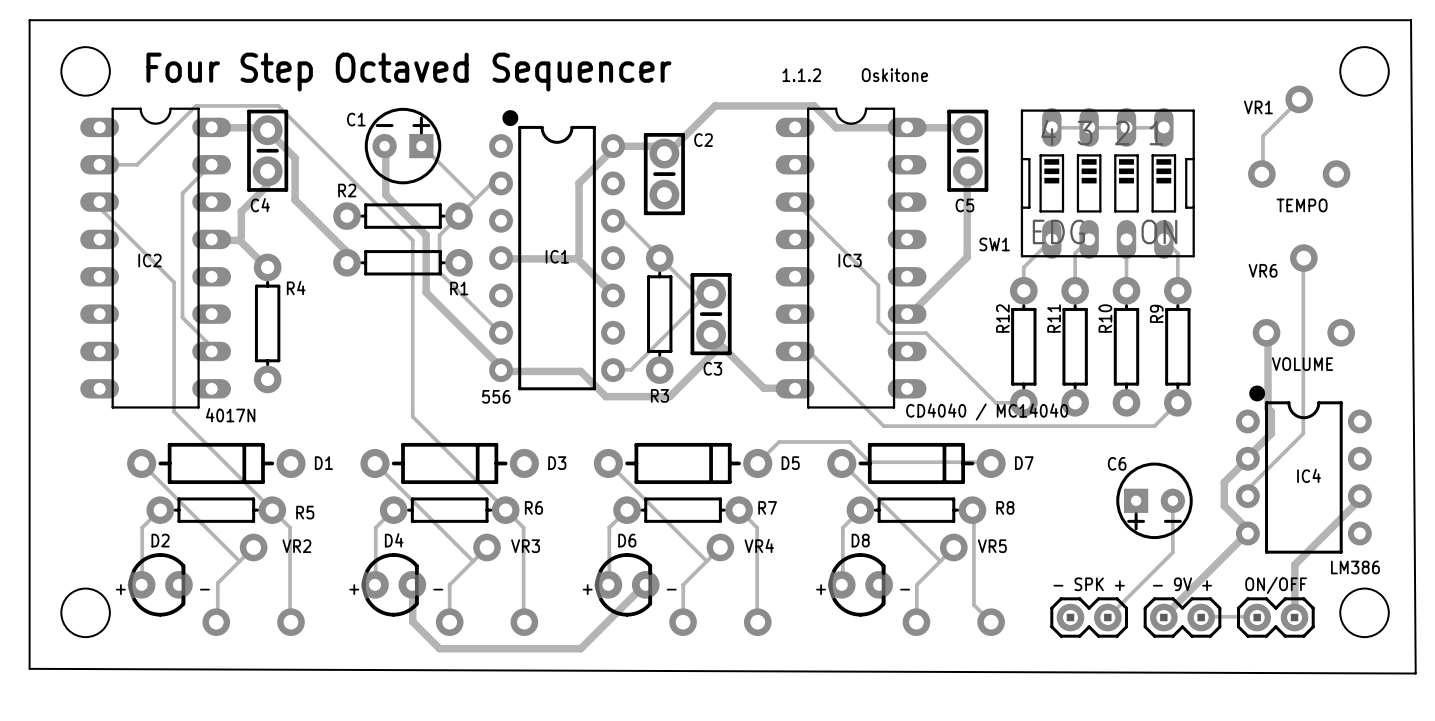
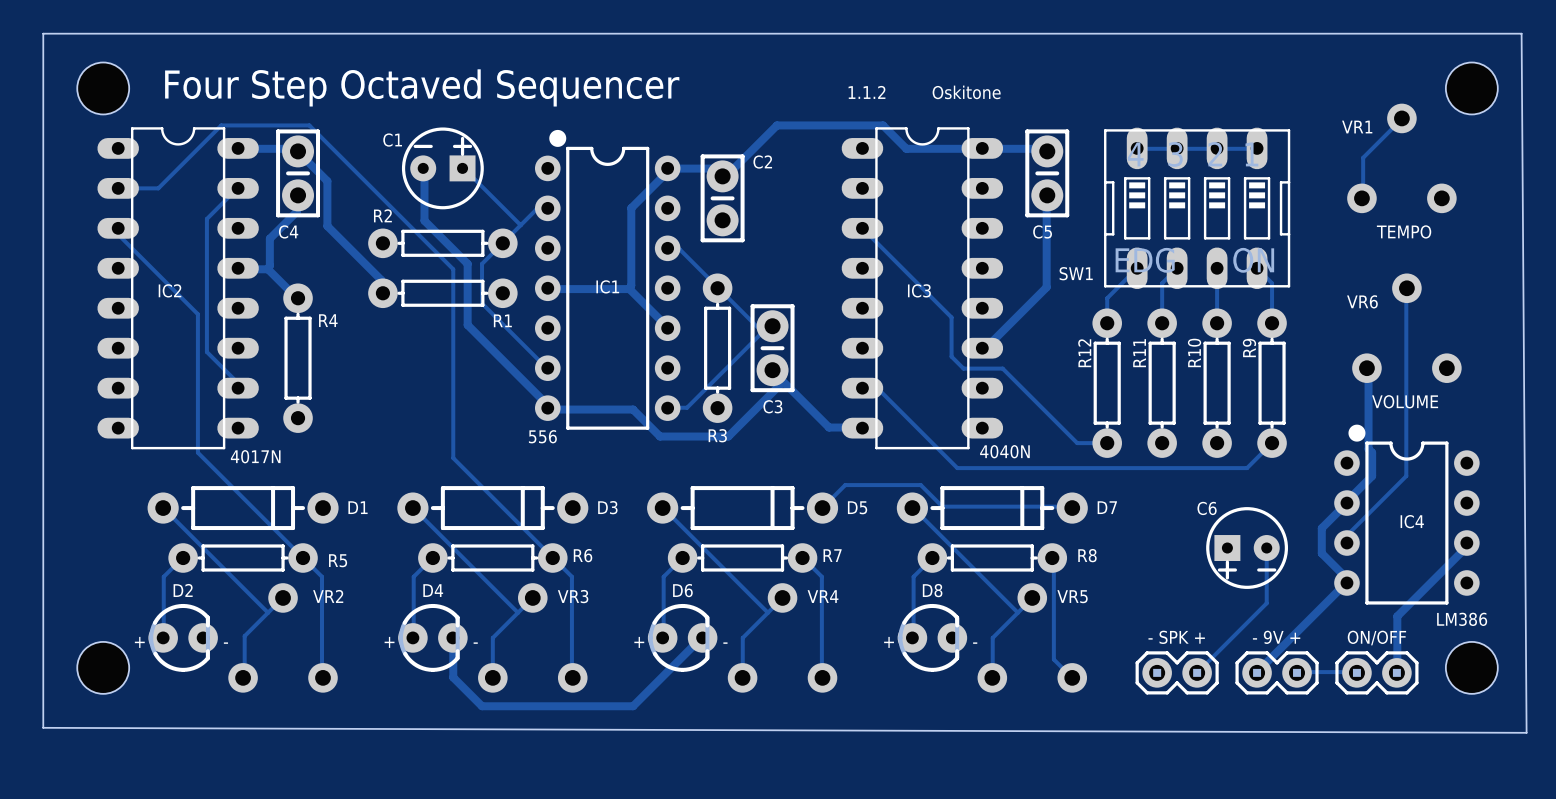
IC3 value: CD4040 / MC14040 (987, 411) -> 4040N (1004, 451)

